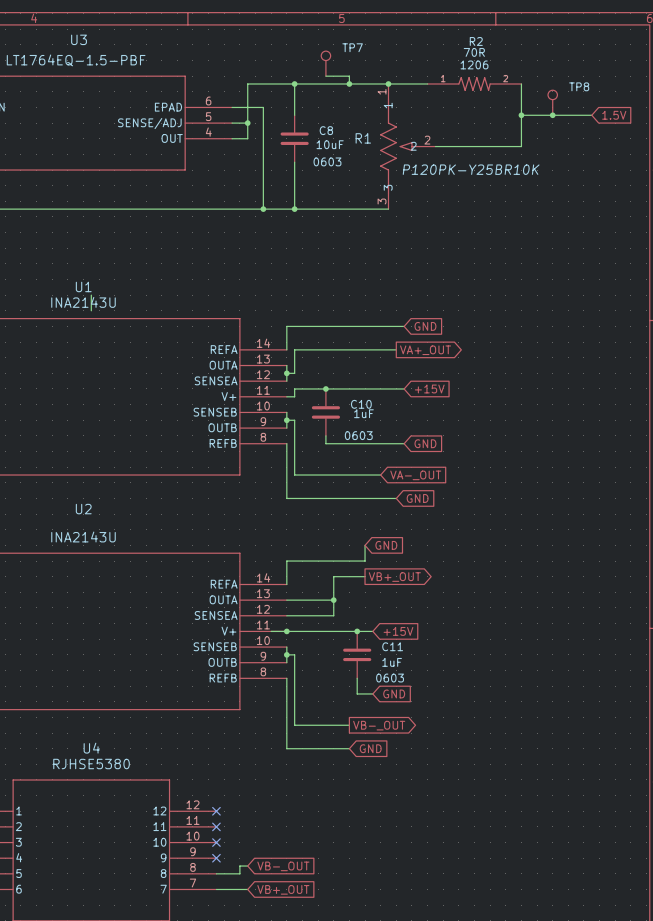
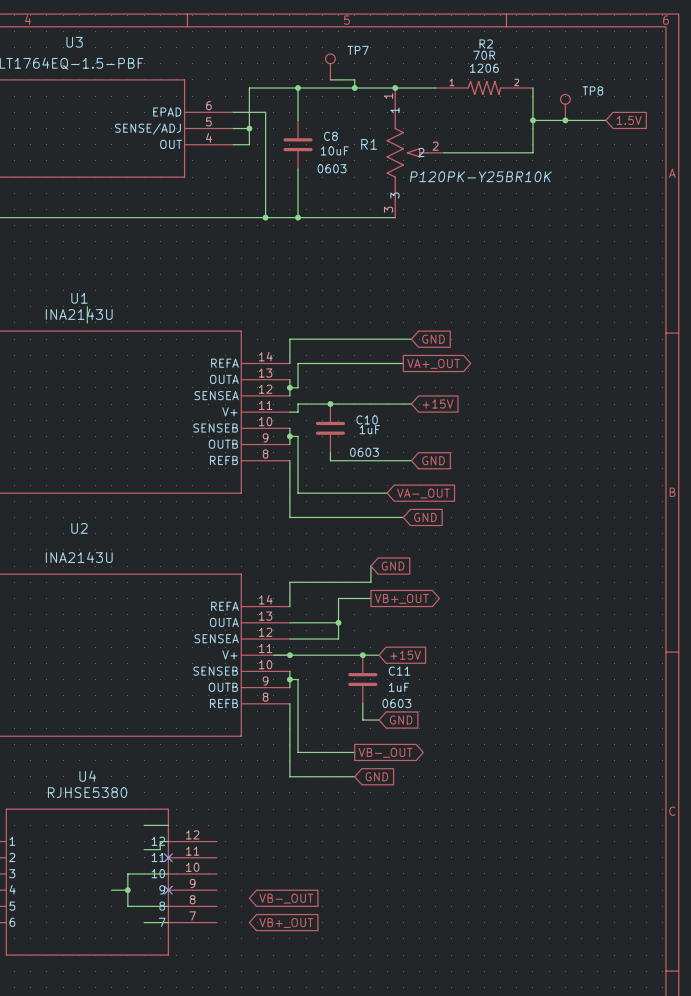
wire: none -> (144, 825) (168, 825)
wire: none -> (168, 841) (160, 841) (160, 849) (144, 849)
no-connect mark: (216, 811) -> none
no-connect mark: none -> (168, 857)
no-connect mark: (216, 826) -> none
wire: none -> (168, 873) (127, 873) (127, 906) (168, 906)
no-connect mark: (216, 842) -> none
wire: none -> (111, 890) (127, 890)
junction: none -> (127, 890)
no-connect mark: none -> (168, 890)
no-connect mark: (216, 858) -> none
wire: (247, 866) (239, 866) (239, 873) (216, 873) -> none
wire: none -> (144, 922) (168, 922)
wire: (216, 889) (247, 889) -> none

